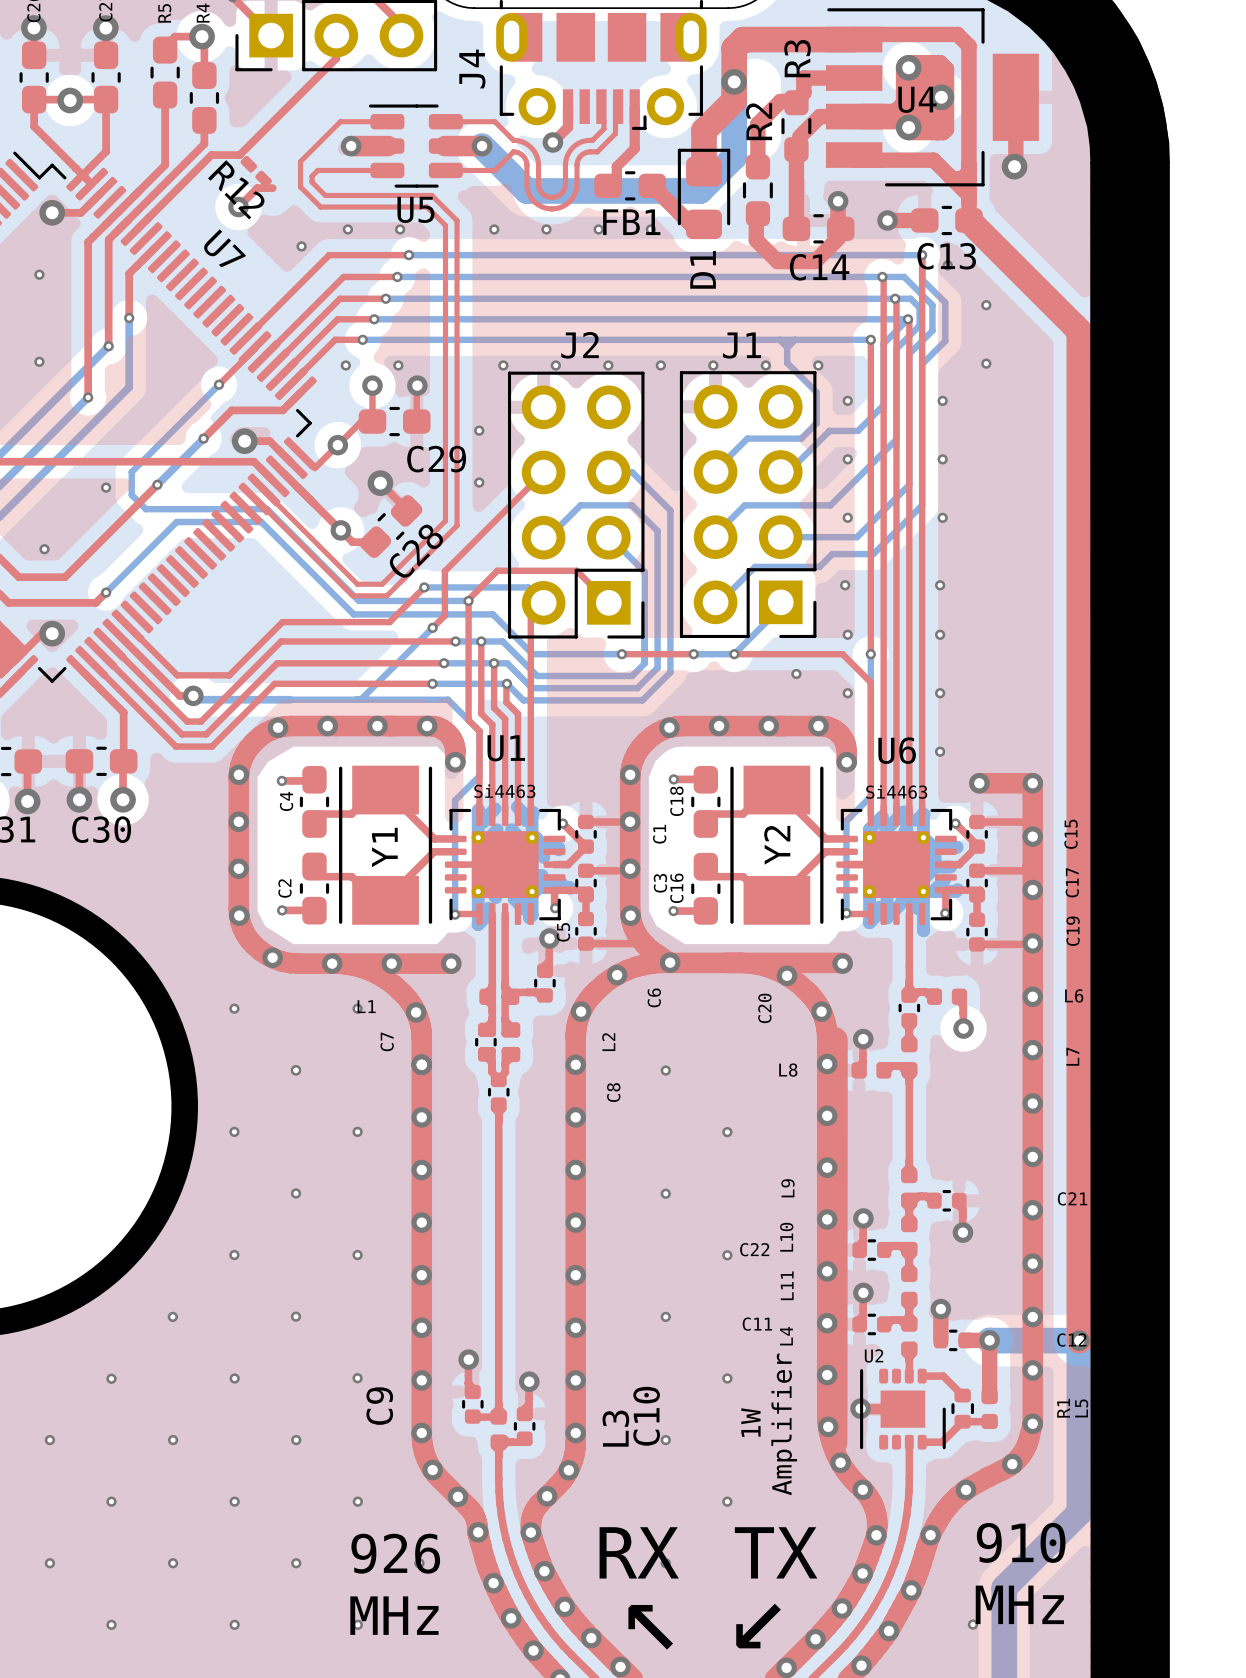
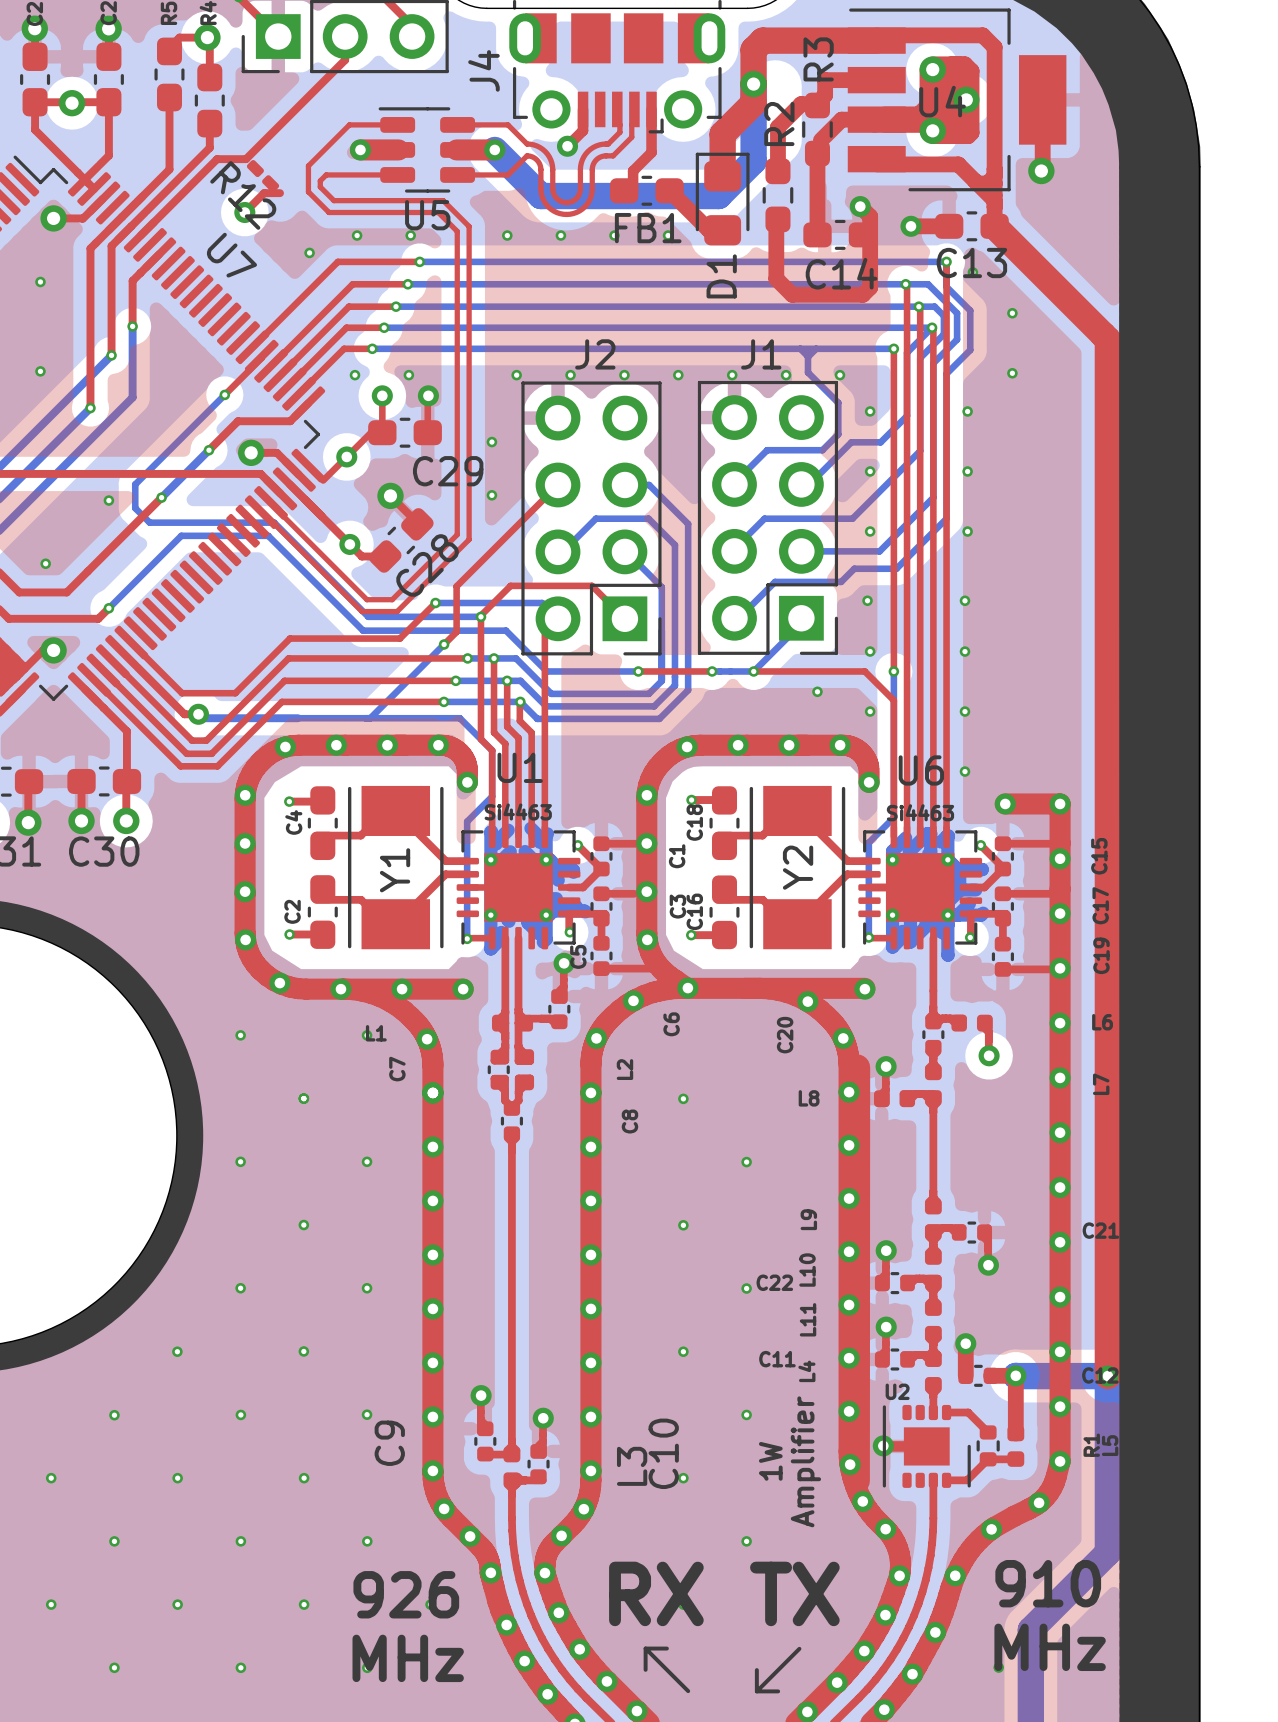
top track: (838, 201) (838, 238) (815, 261) (777, 261) (756, 240) -> (860, 206) (870, 216) (870, 287) (862, 294) (792, 294) (776, 278) (776, 246)

